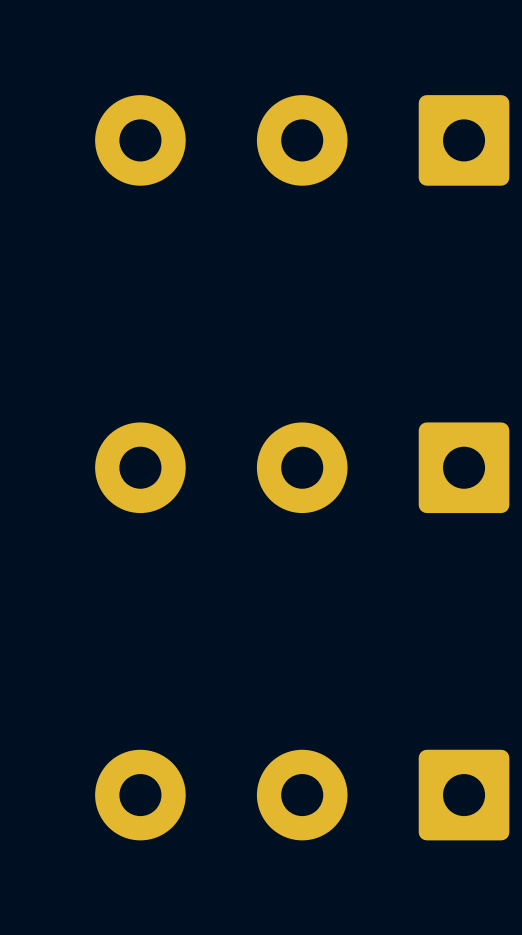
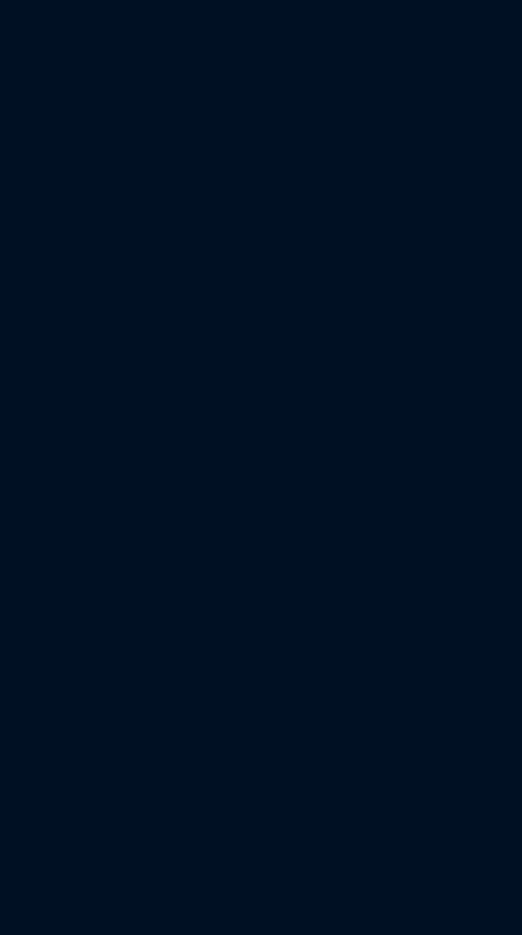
part: (302, 140) -> none
part: (302, 467) -> none
part: (302, 795) -> none

